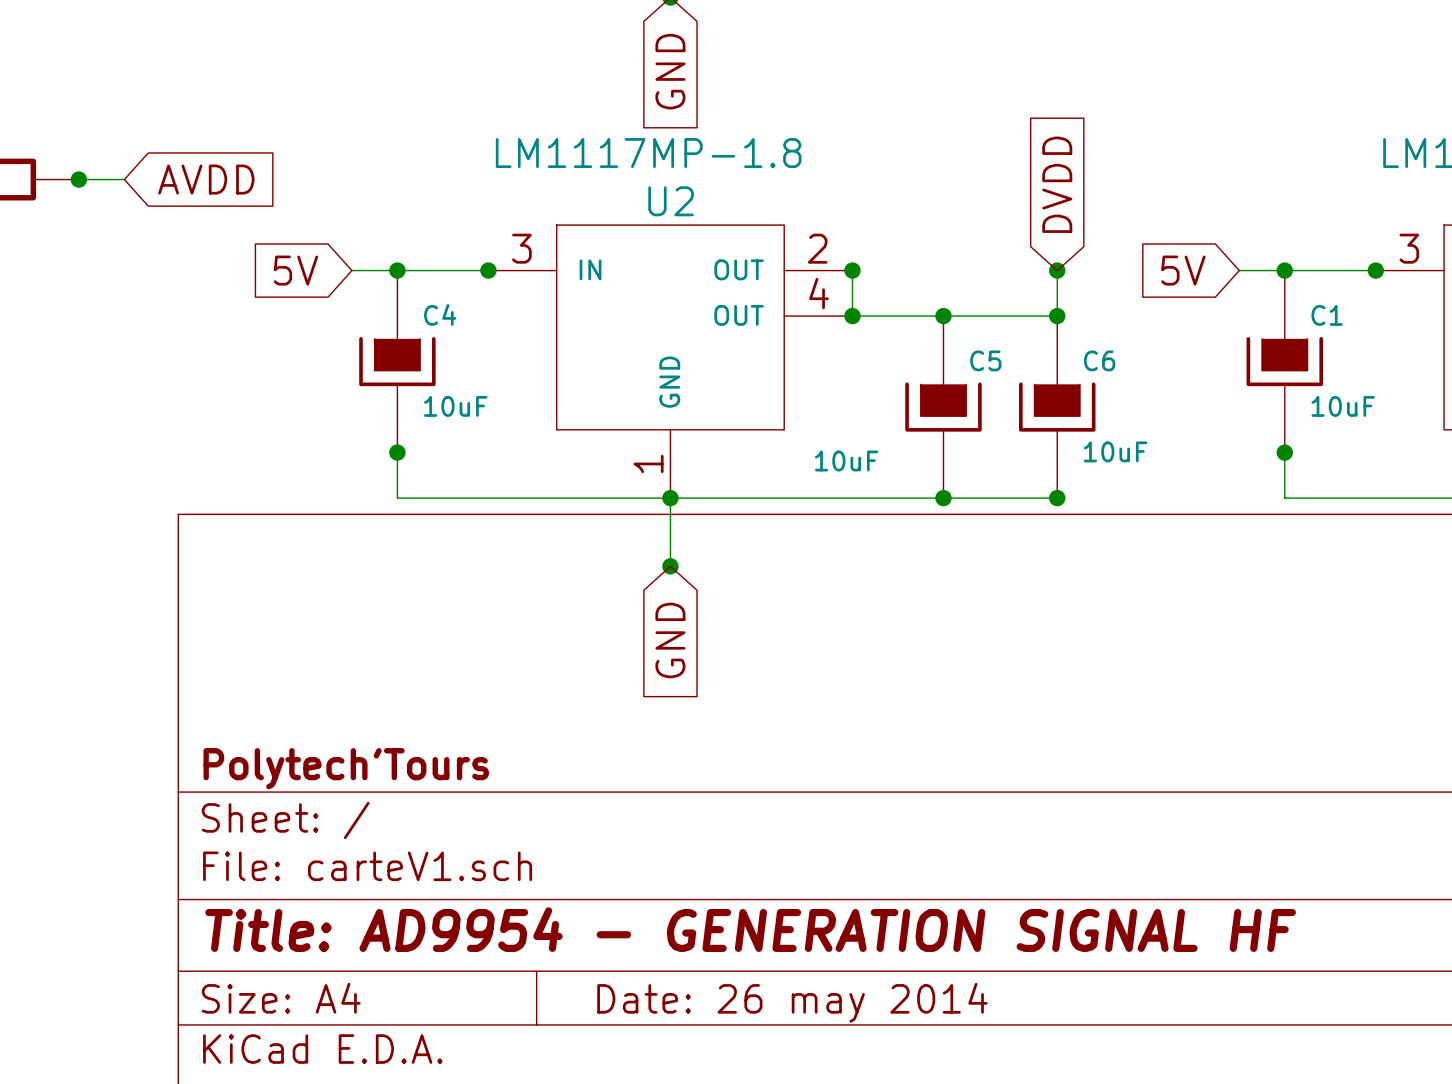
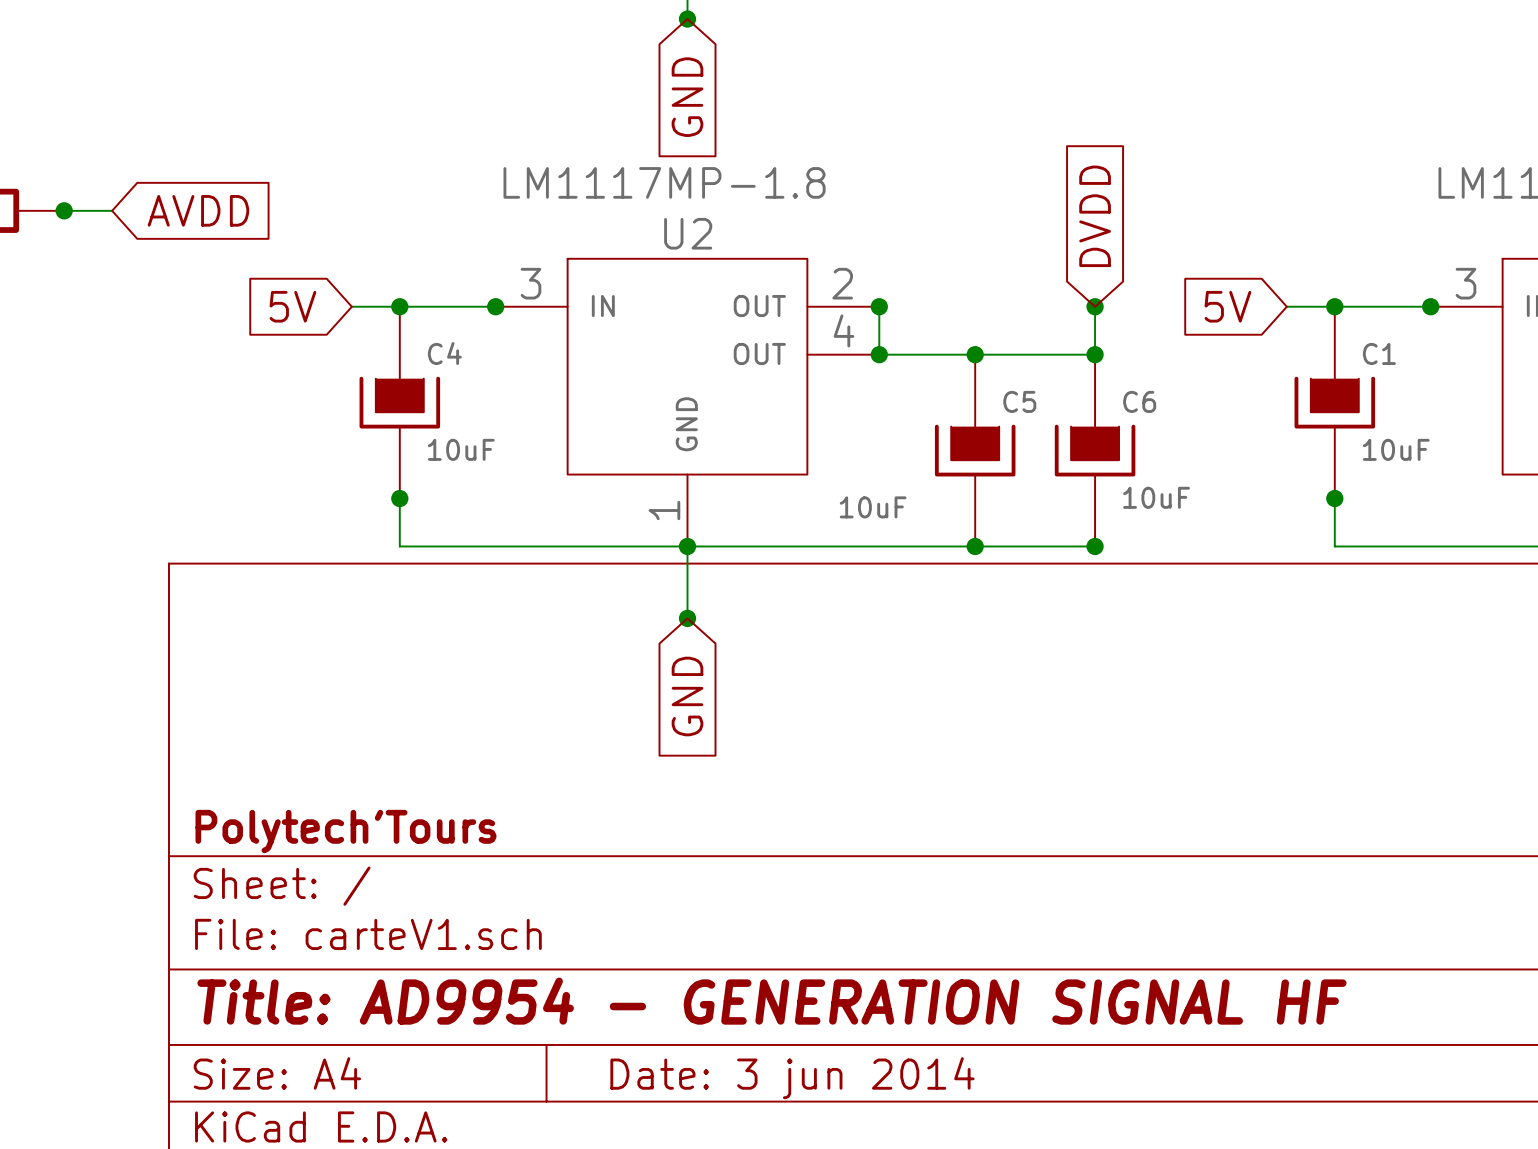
title block: Date: 26 may 2014 (792, 1002) -> Date: 3 jun 2014 (792, 1078)

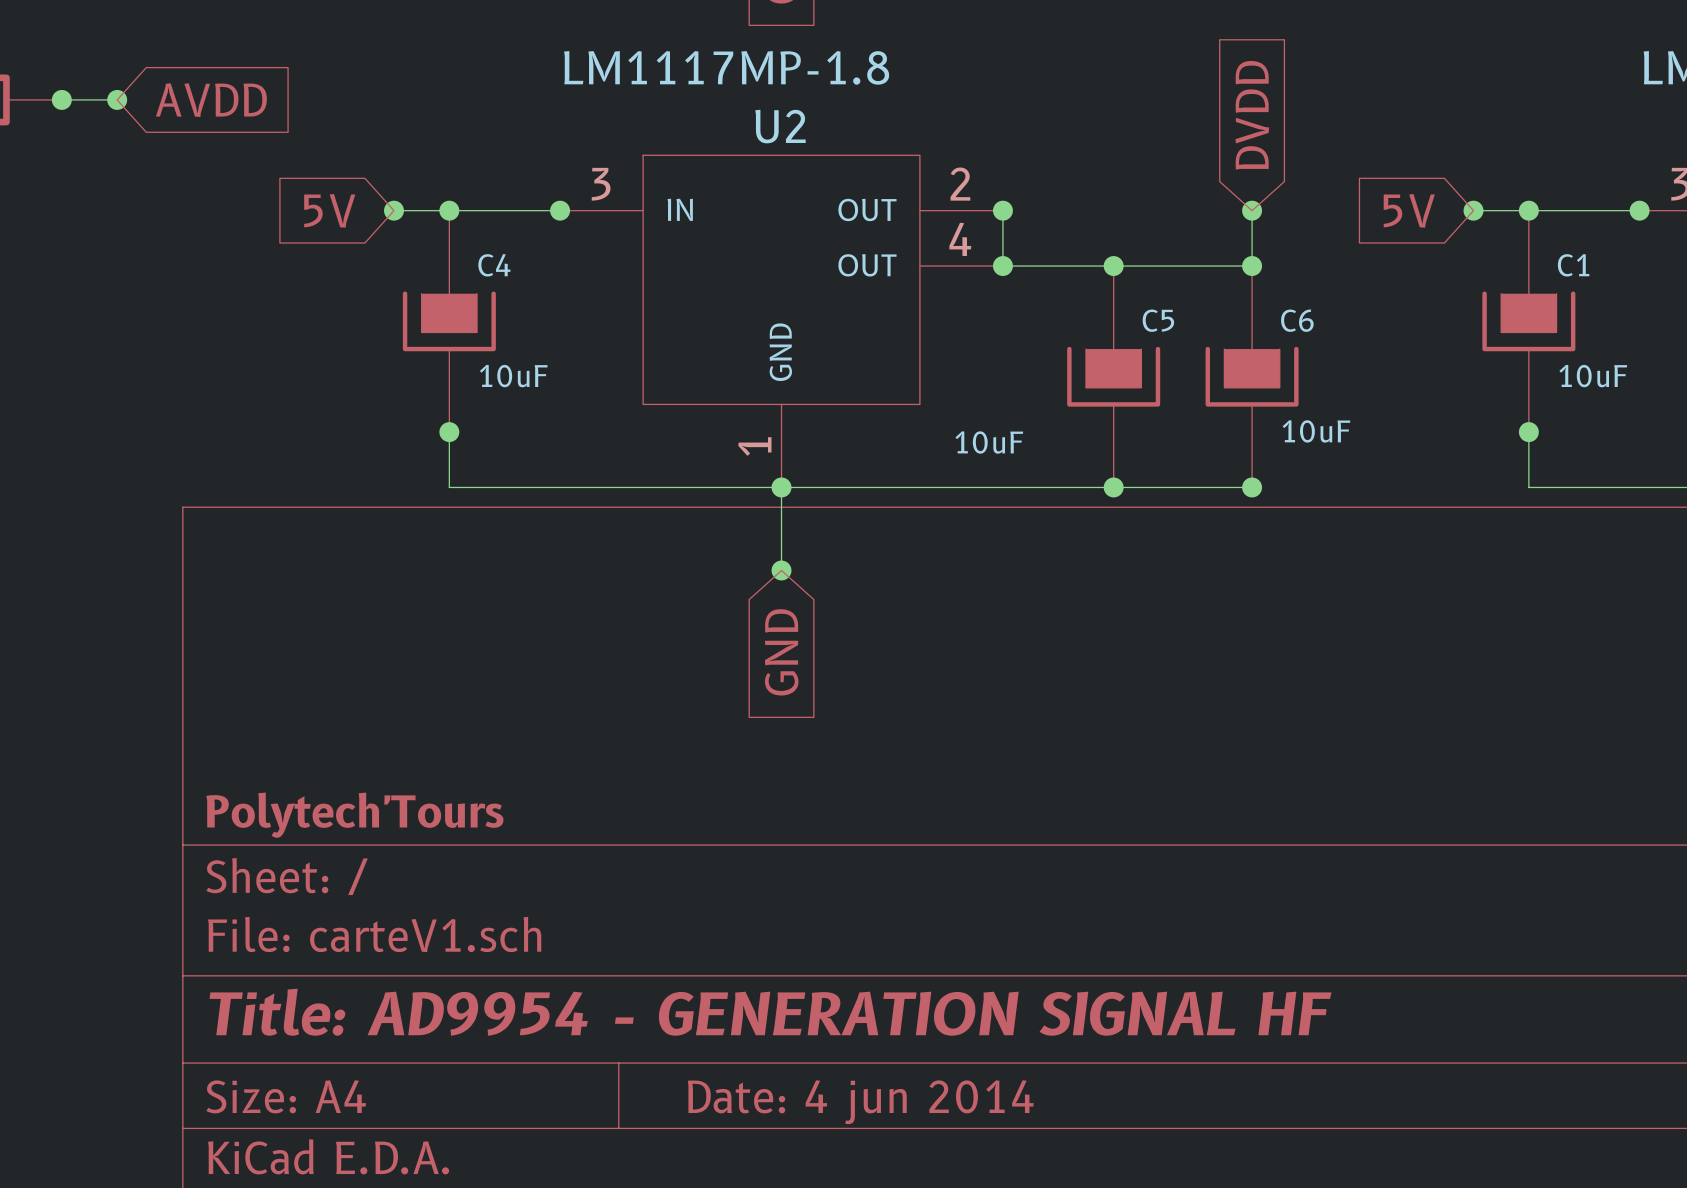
junction: none -> (117, 99)
junction: none -> (393, 210)
junction: none -> (1473, 210)
title block: Date: 3 jun 2014 (792, 1078) -> Date: 4 jun 2014 (860, 1102)

